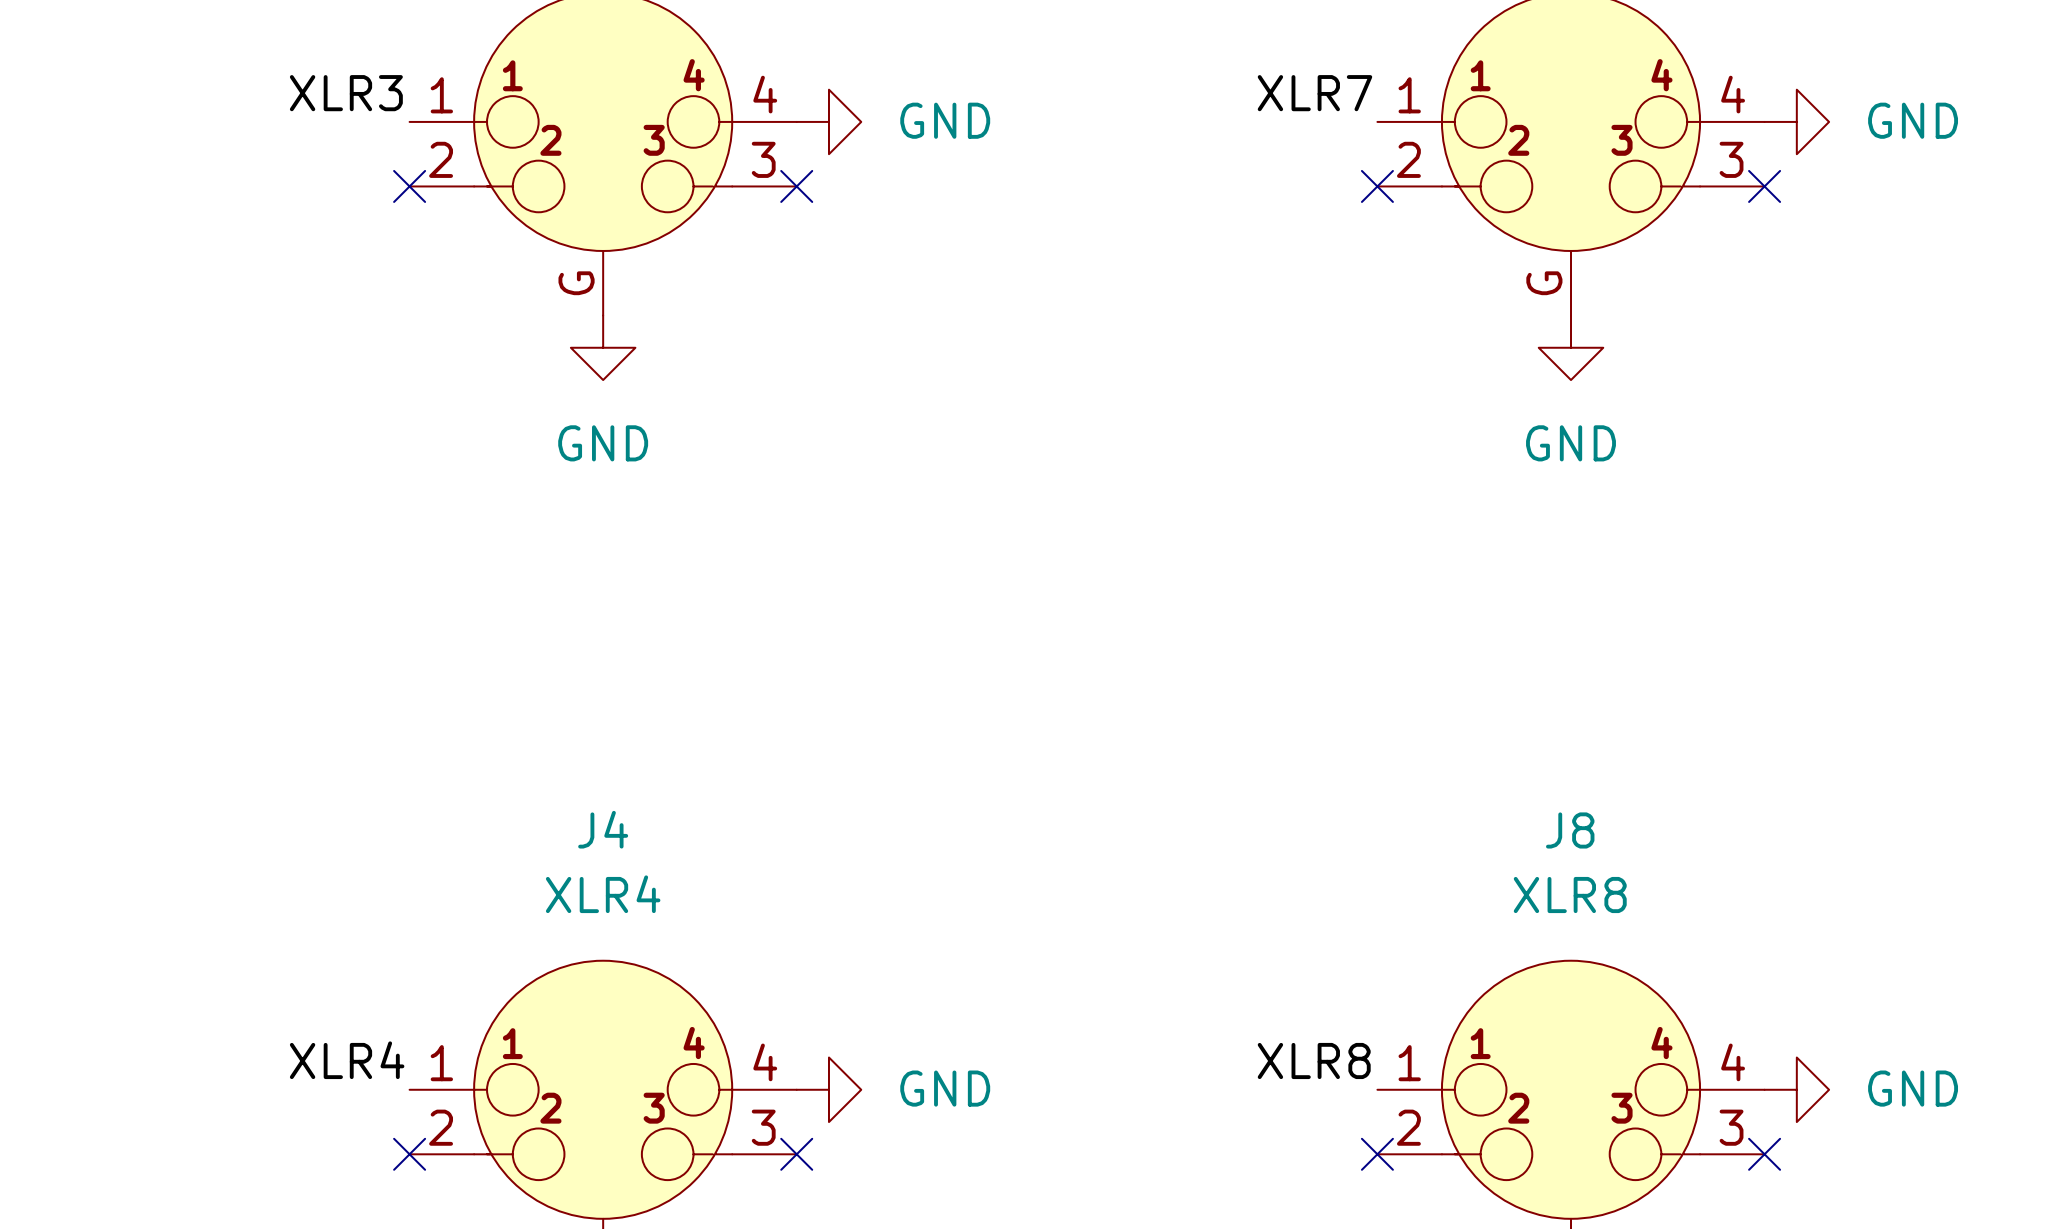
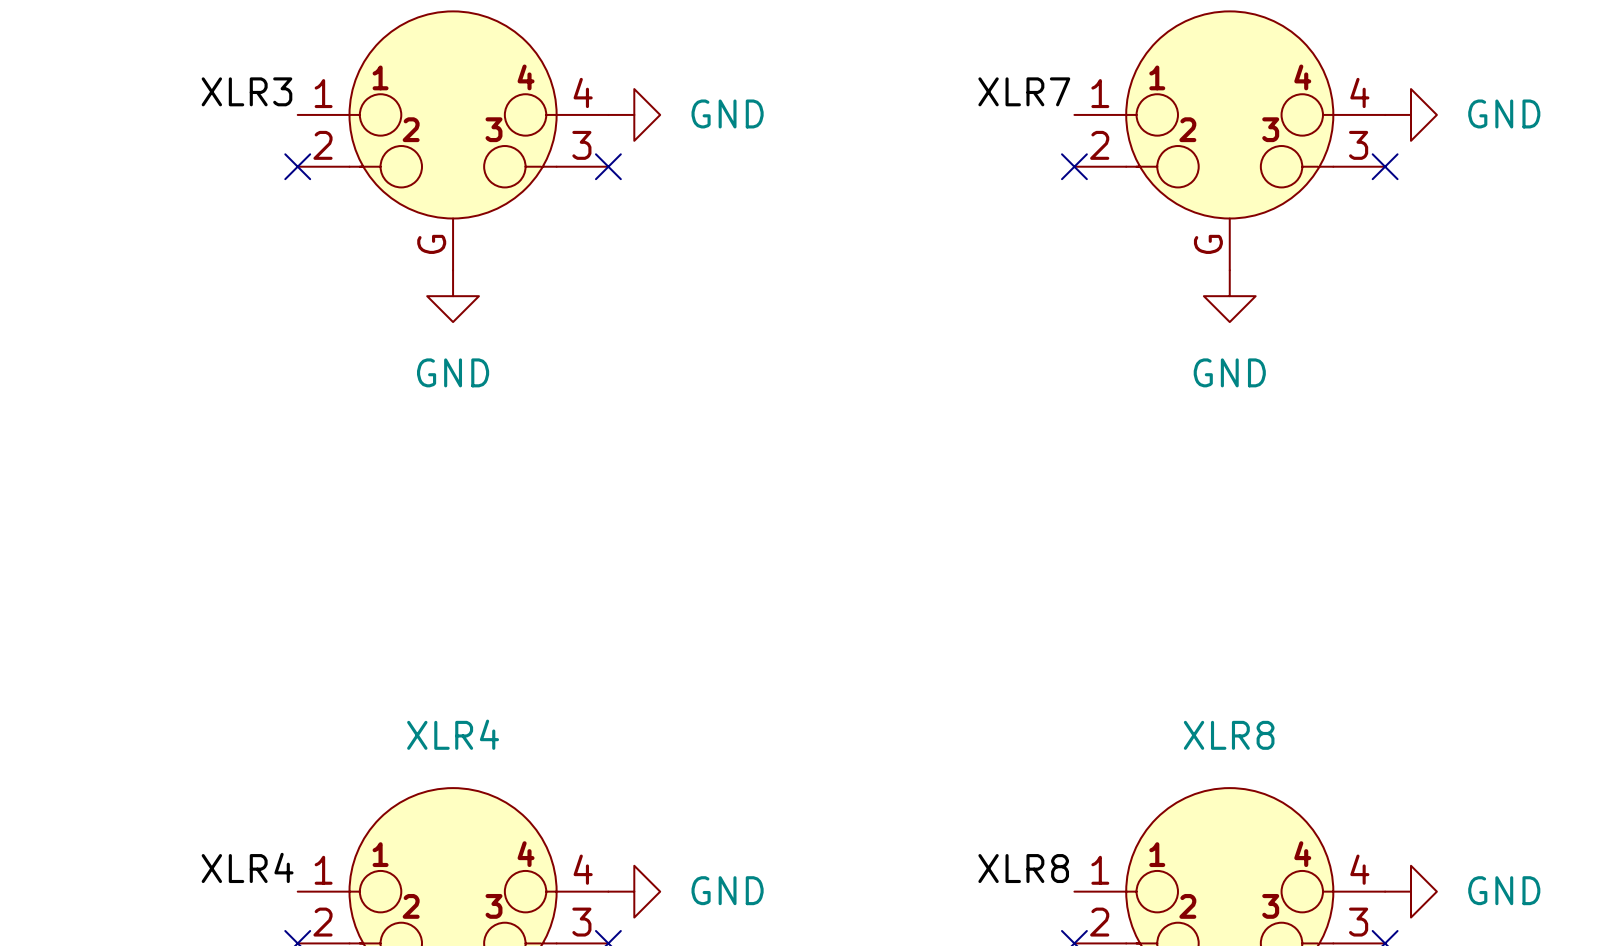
J4 name: J4 (603, 829) -> XLR4 (453, 734)
J8 name: J8 (1570, 830) -> XLR8 (1229, 735)

